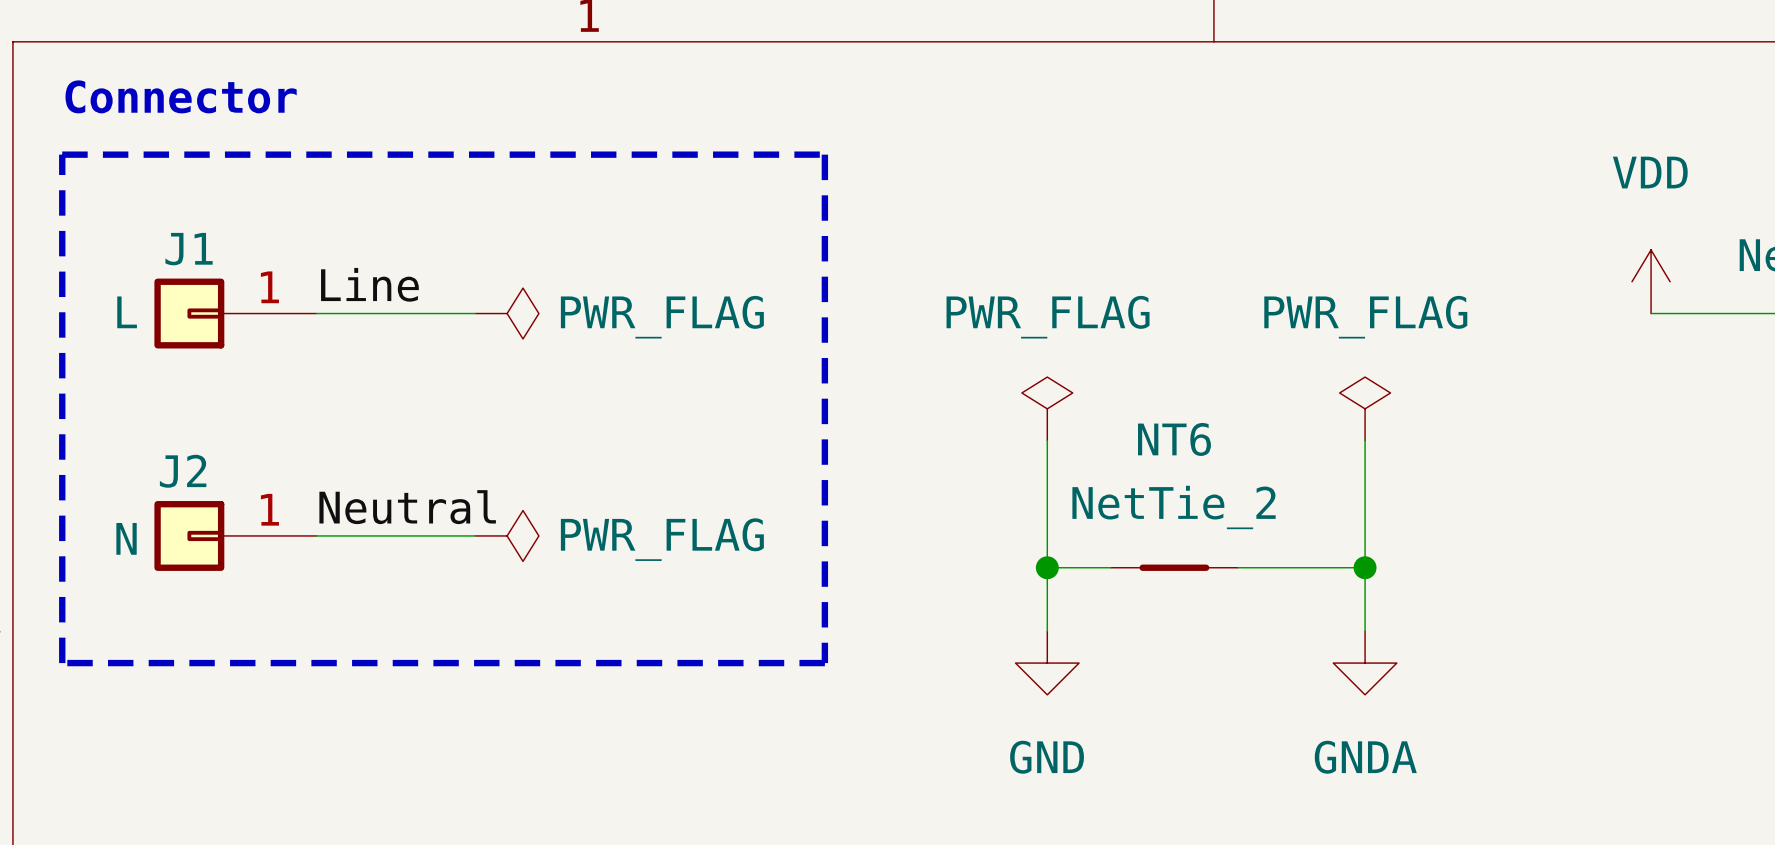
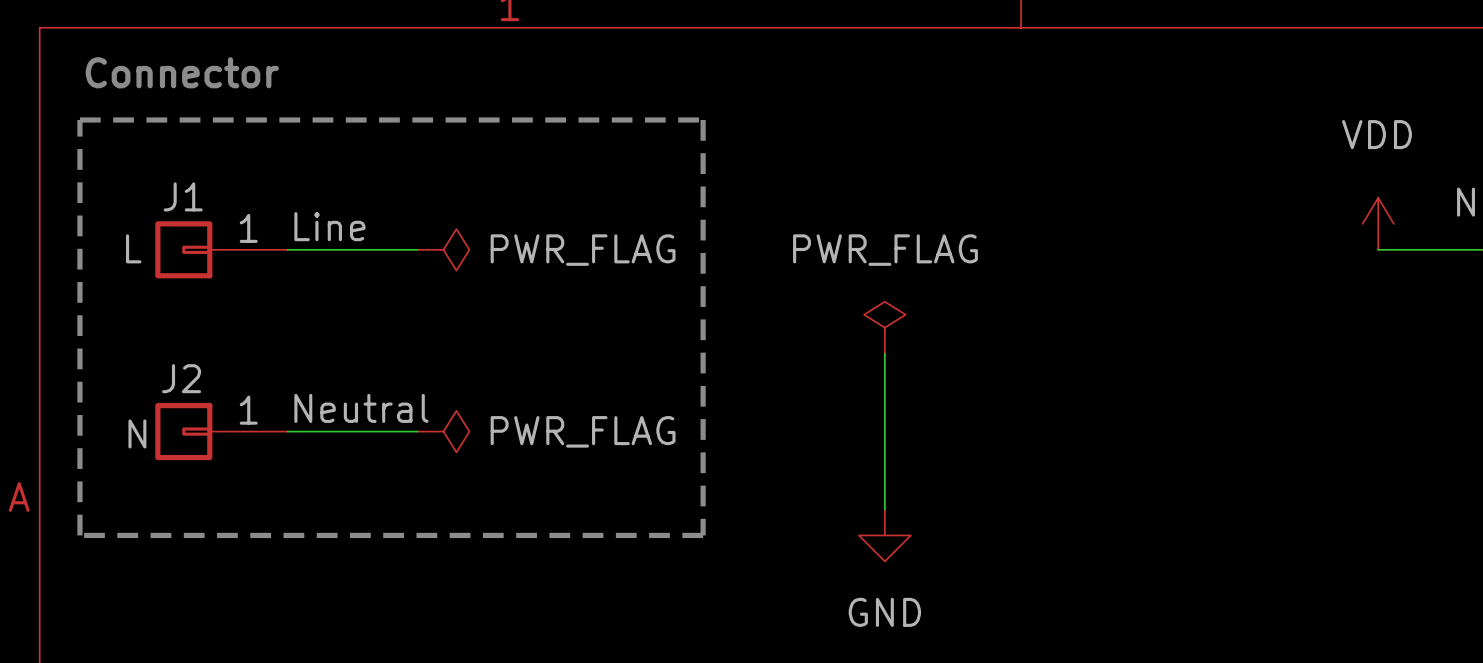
power symbol: PWR_FLAG (1365, 408) -> none
wire: (1365, 440) (1365, 631) -> none
wire: (1047, 567) (1110, 567) -> none
junction: (1047, 567) -> none
NT6: NetTie_2 (1174, 567) -> none
wire: (1237, 567) (1365, 567) -> none
junction: (1365, 567) -> none
power symbol: GNDA (1365, 663) -> none

